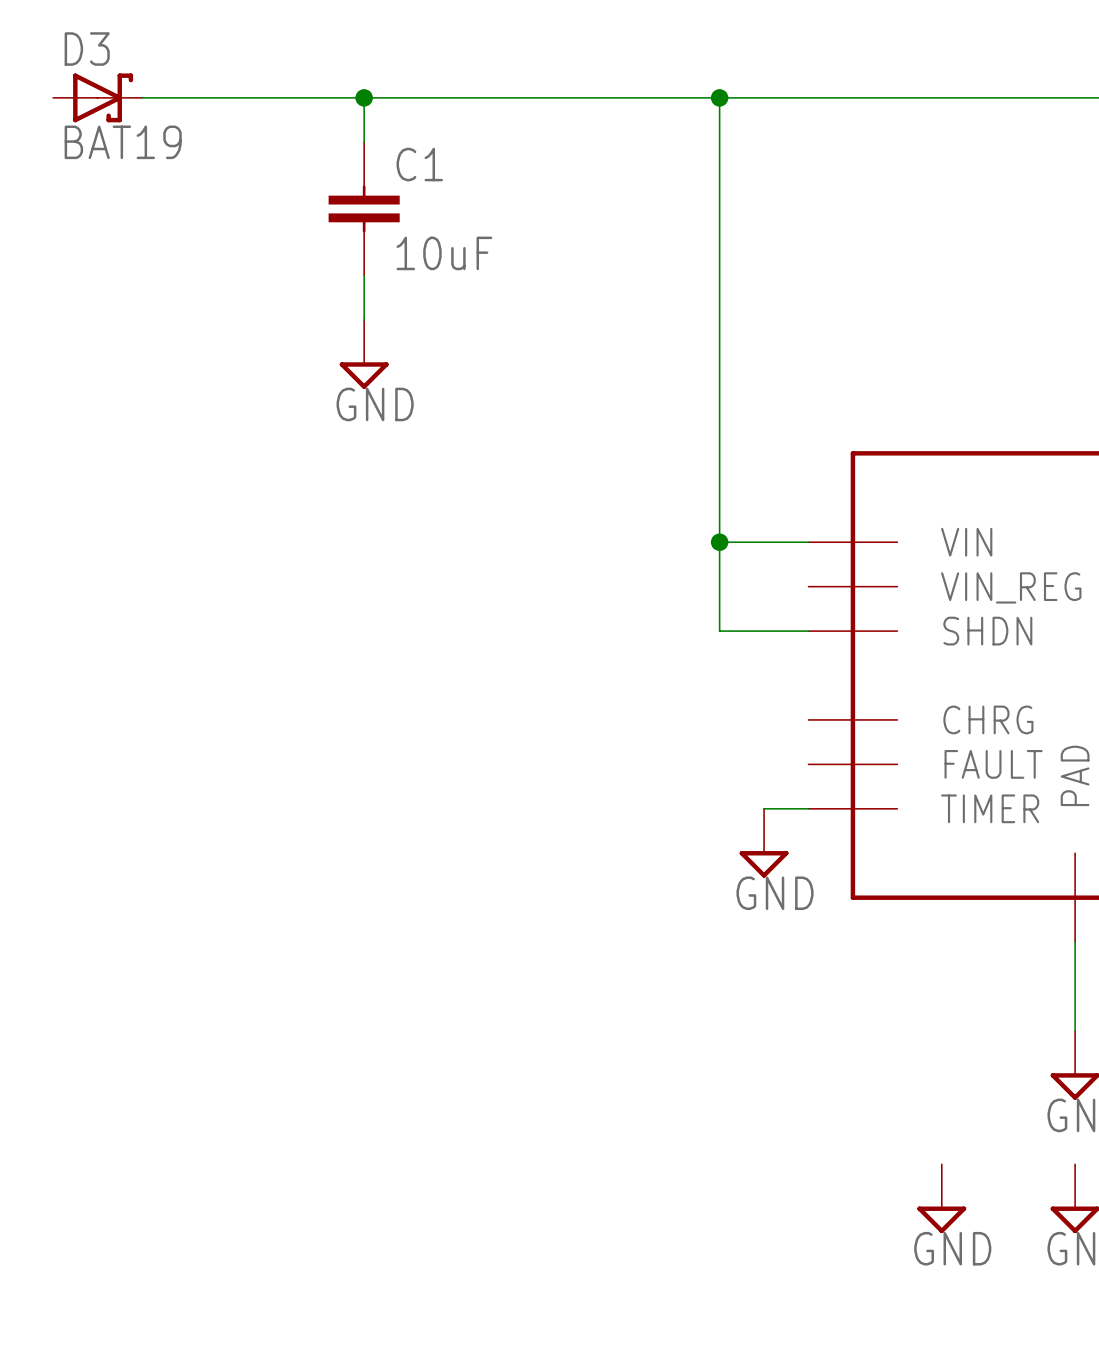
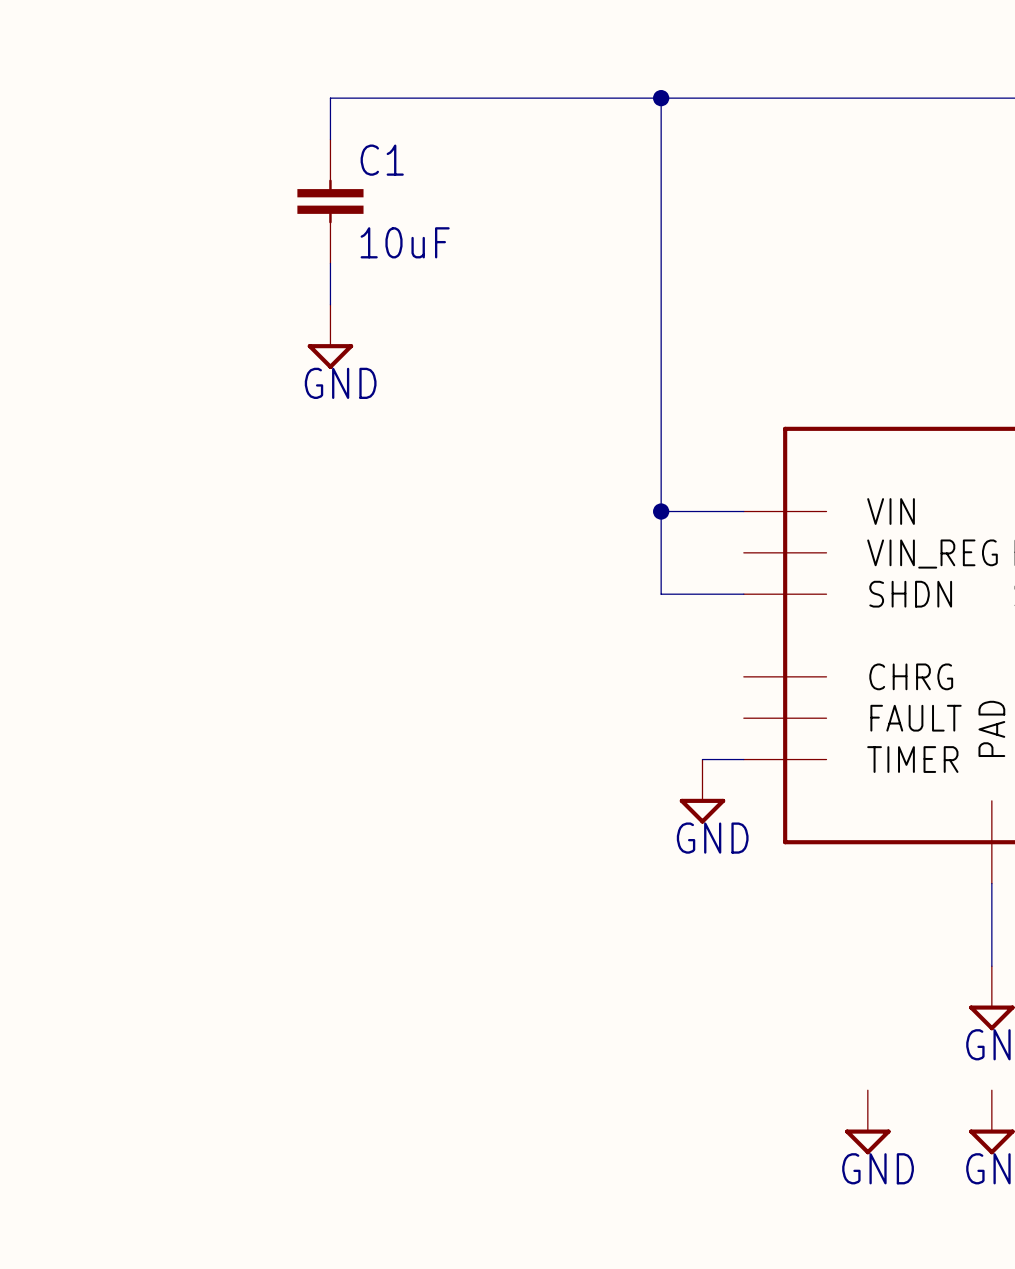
D3: BAT19 (97, 97) -> none
wire: (141, 97) (364, 97) -> none
junction: (364, 97) -> none

